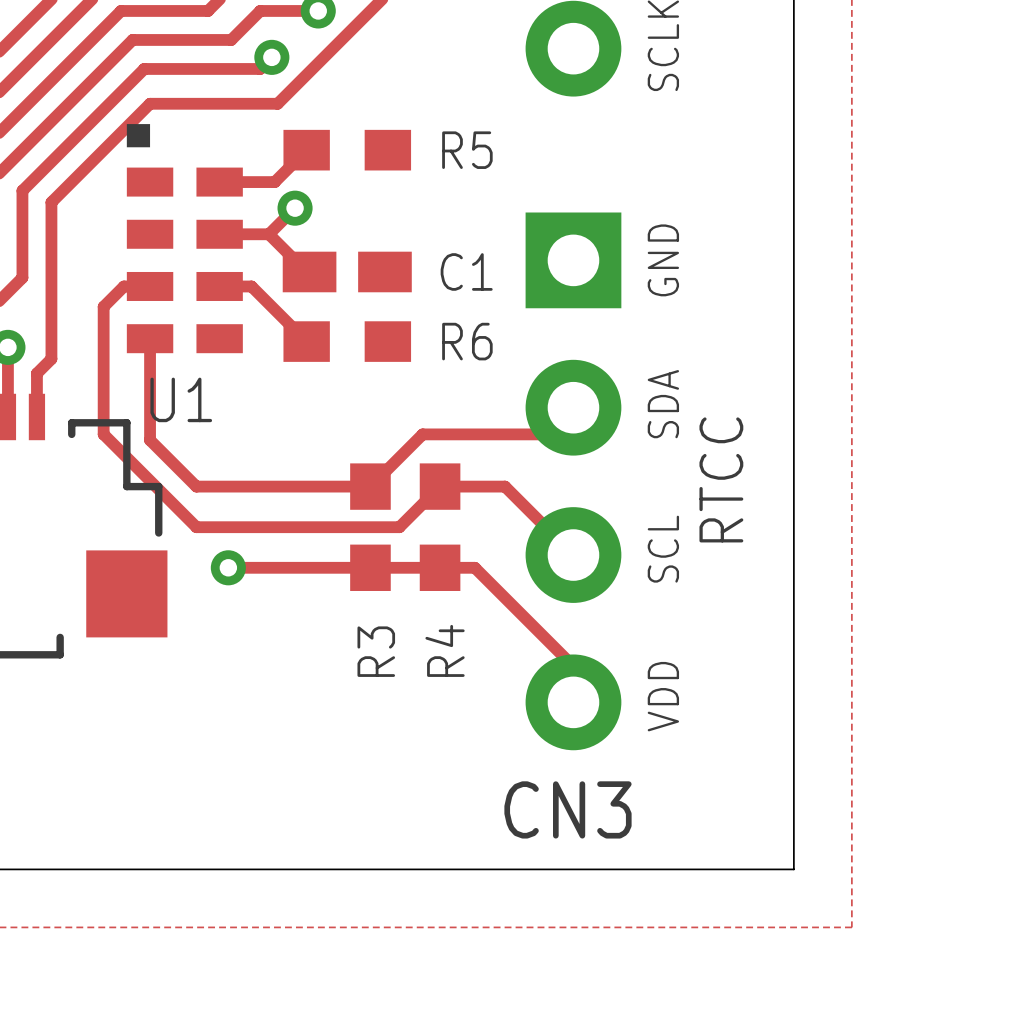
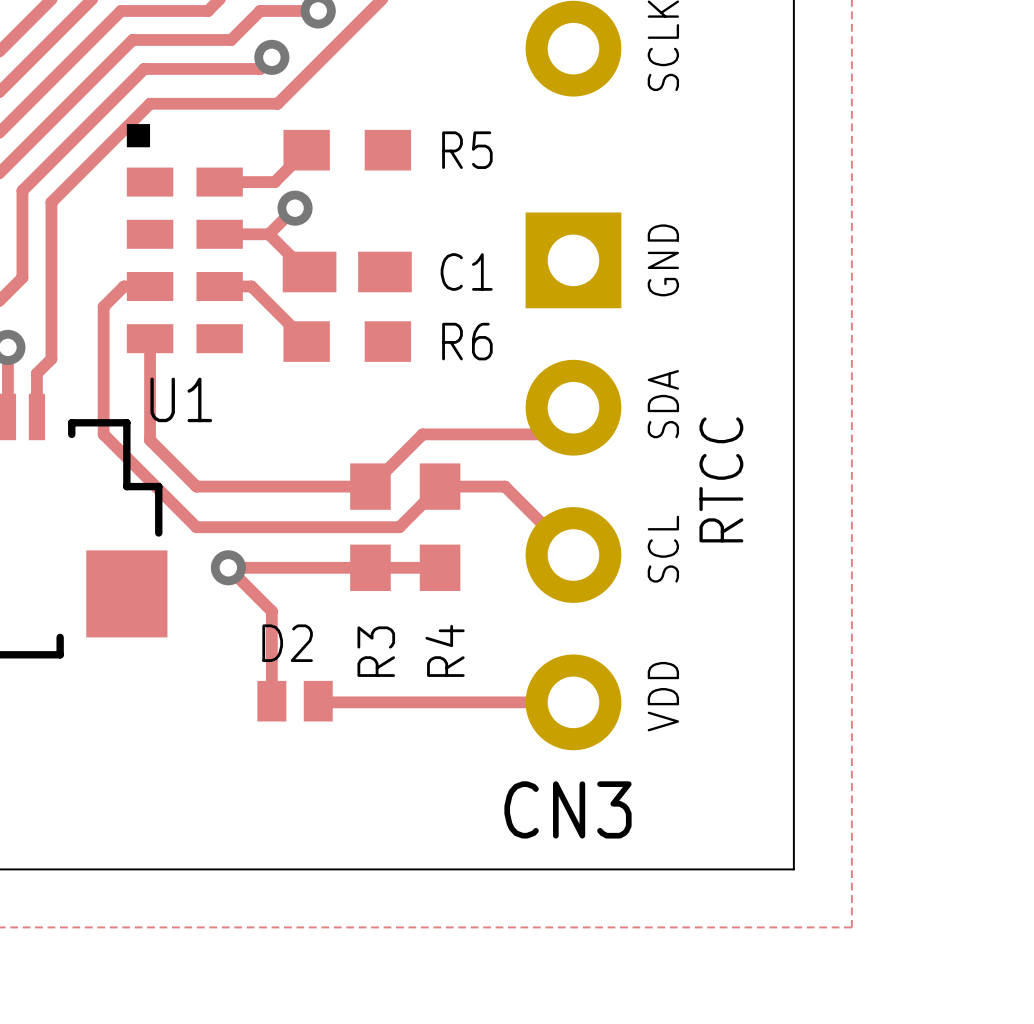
track: none -> (228, 567) (271, 611) (271, 701)
track: (440, 567) (474, 567) (573, 666) (573, 702) -> (318, 701) (573, 702)
D2: none -> (295, 701)

